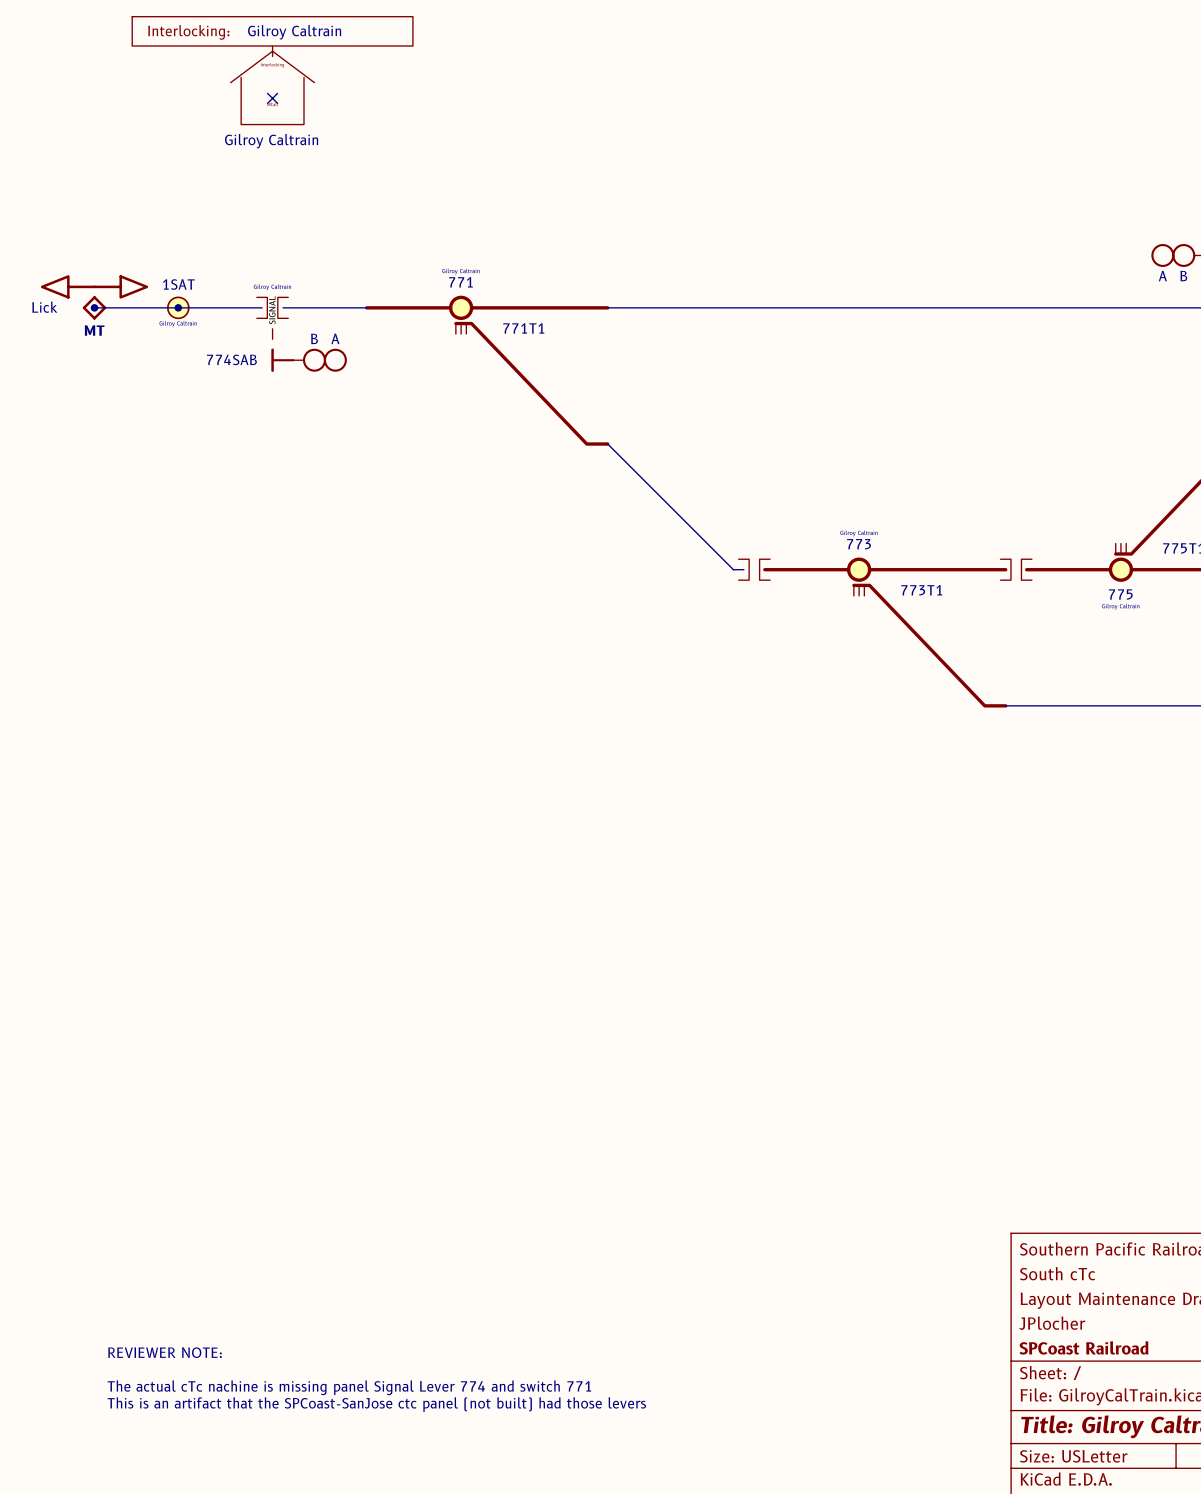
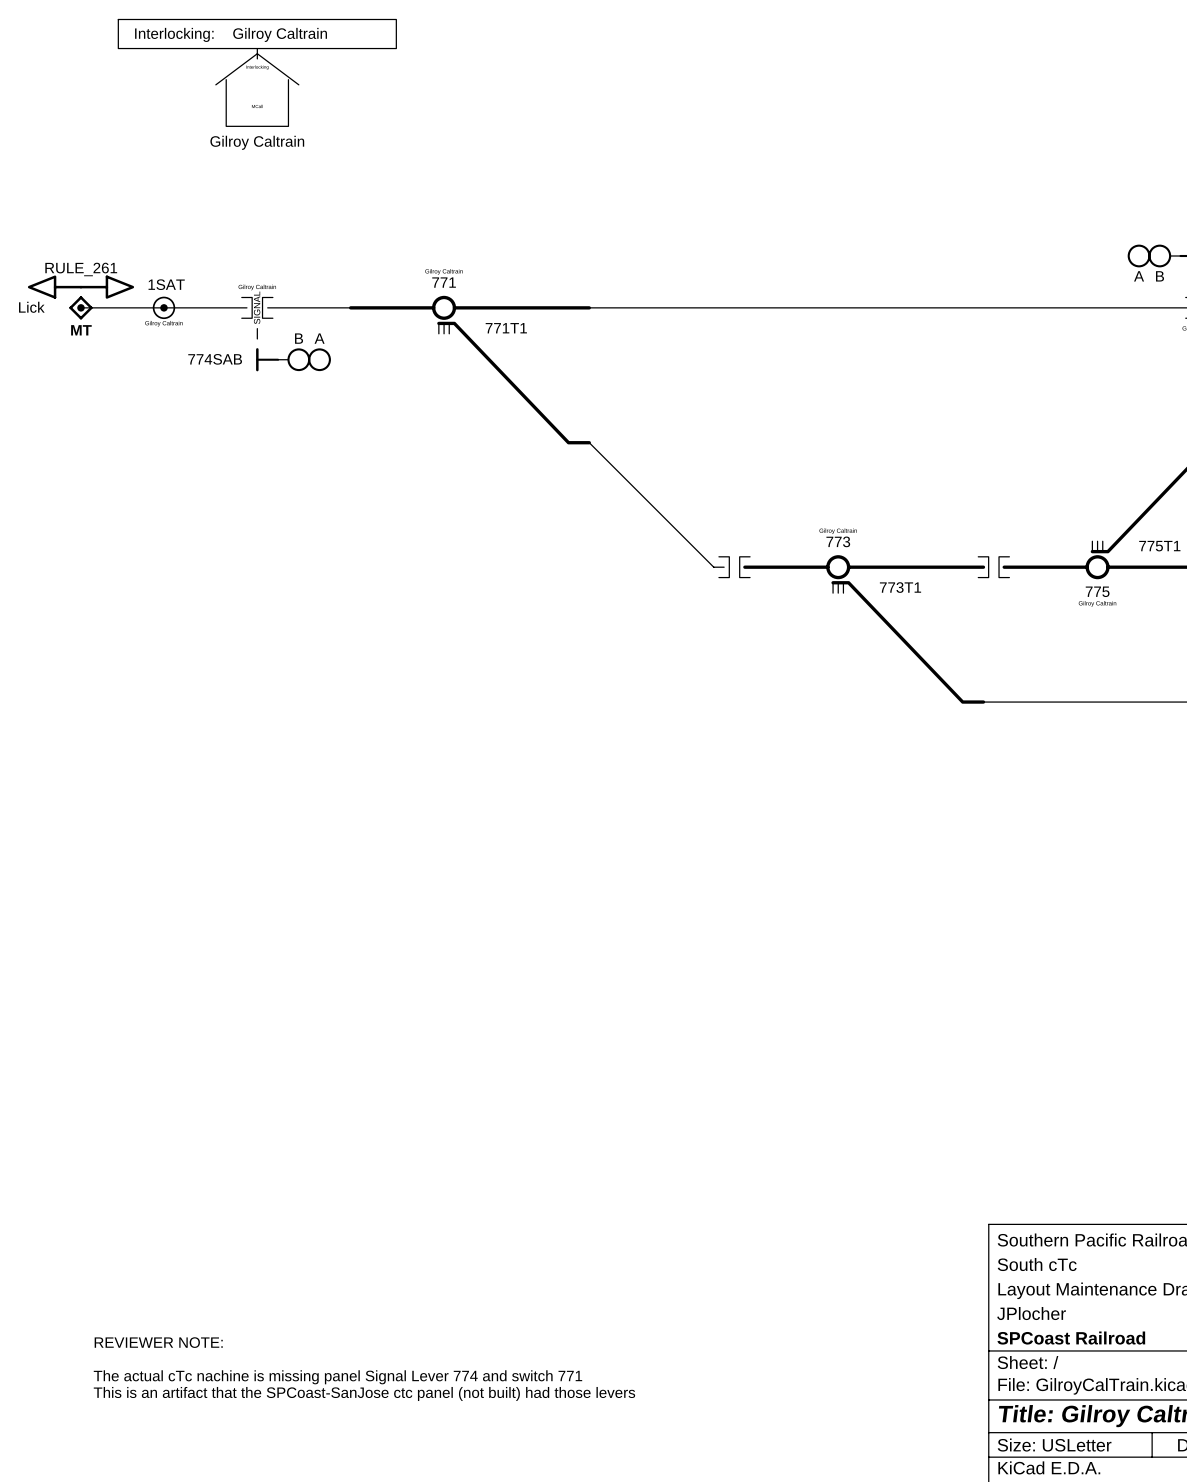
no-connect mark: (272, 98) -> none
part text: none -> RULE_261 (81, 269)

